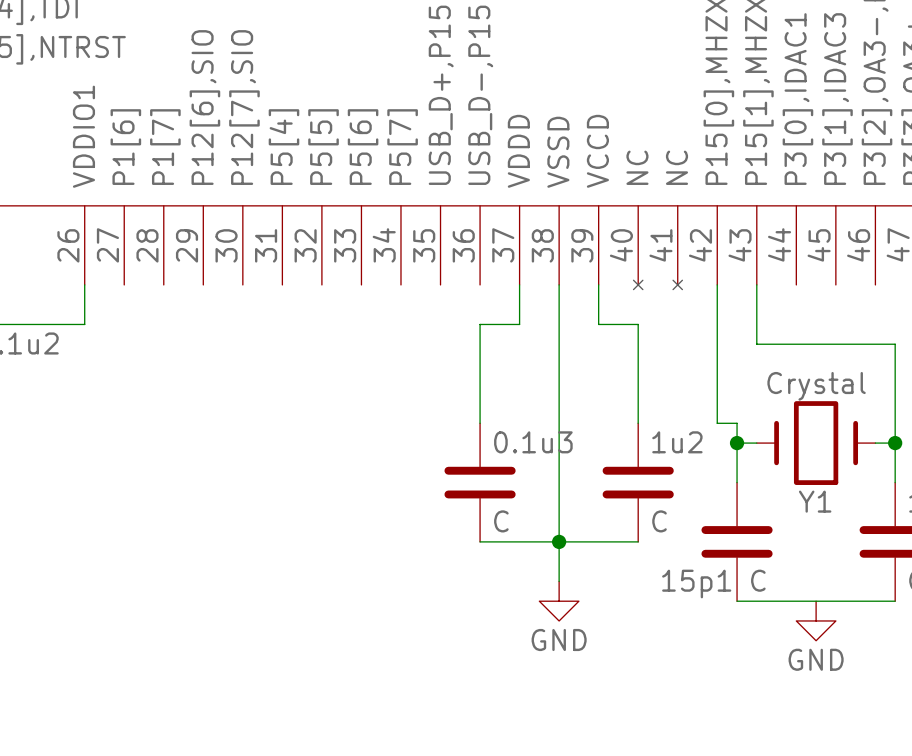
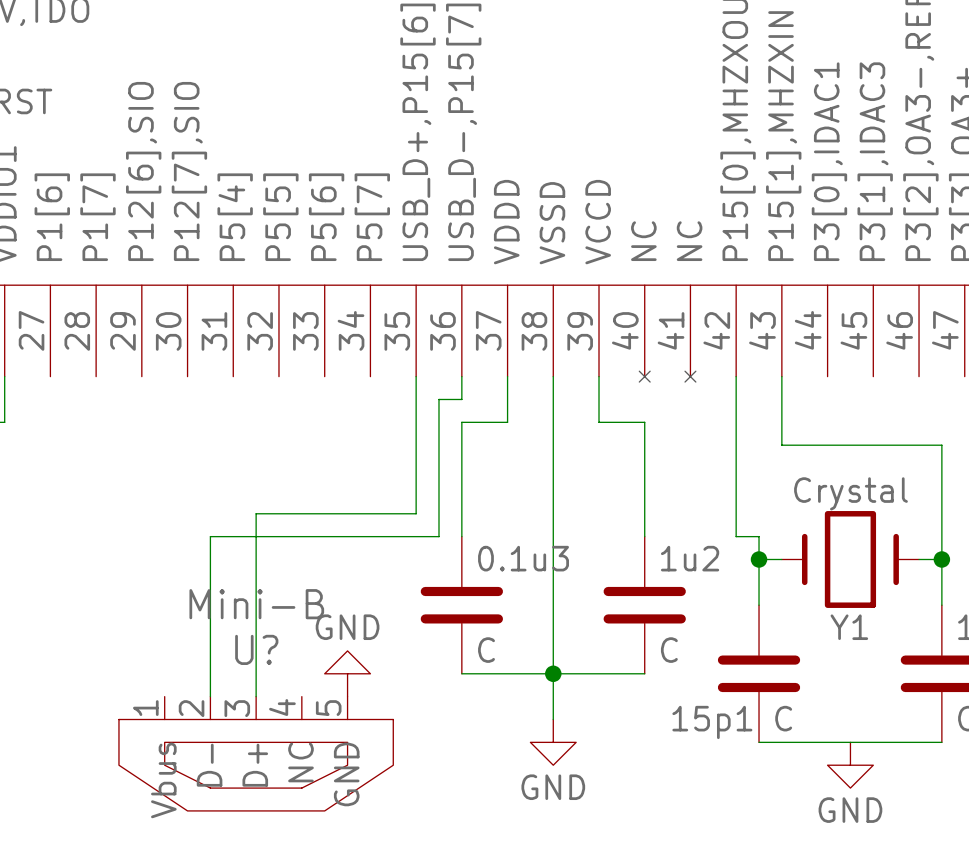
wire: none -> (416, 376) (416, 513) (256, 513) (256, 696)
wire: none -> (461, 376) (461, 399) (438, 399) (438, 536) (210, 536) (210, 696)
power symbol: none -> GND (347, 673)
U?: none -> Mini-B (256, 753)

